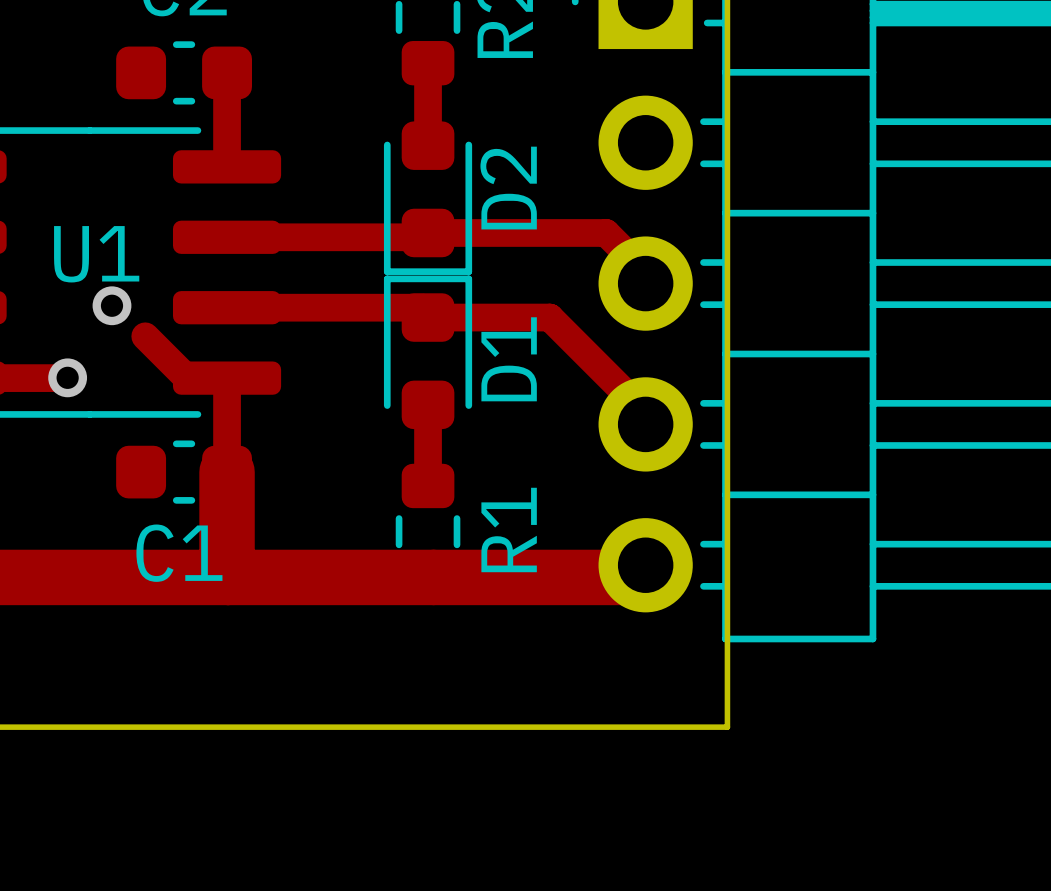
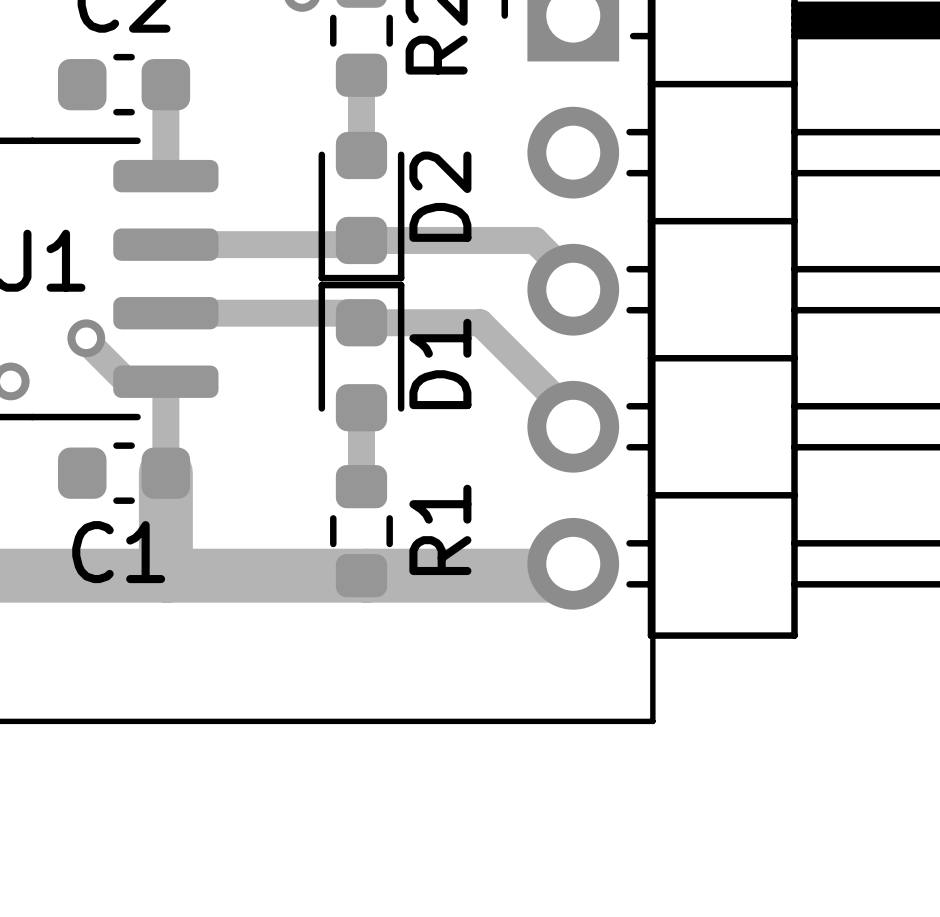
via position: (111, 305) -> (86, 338)

